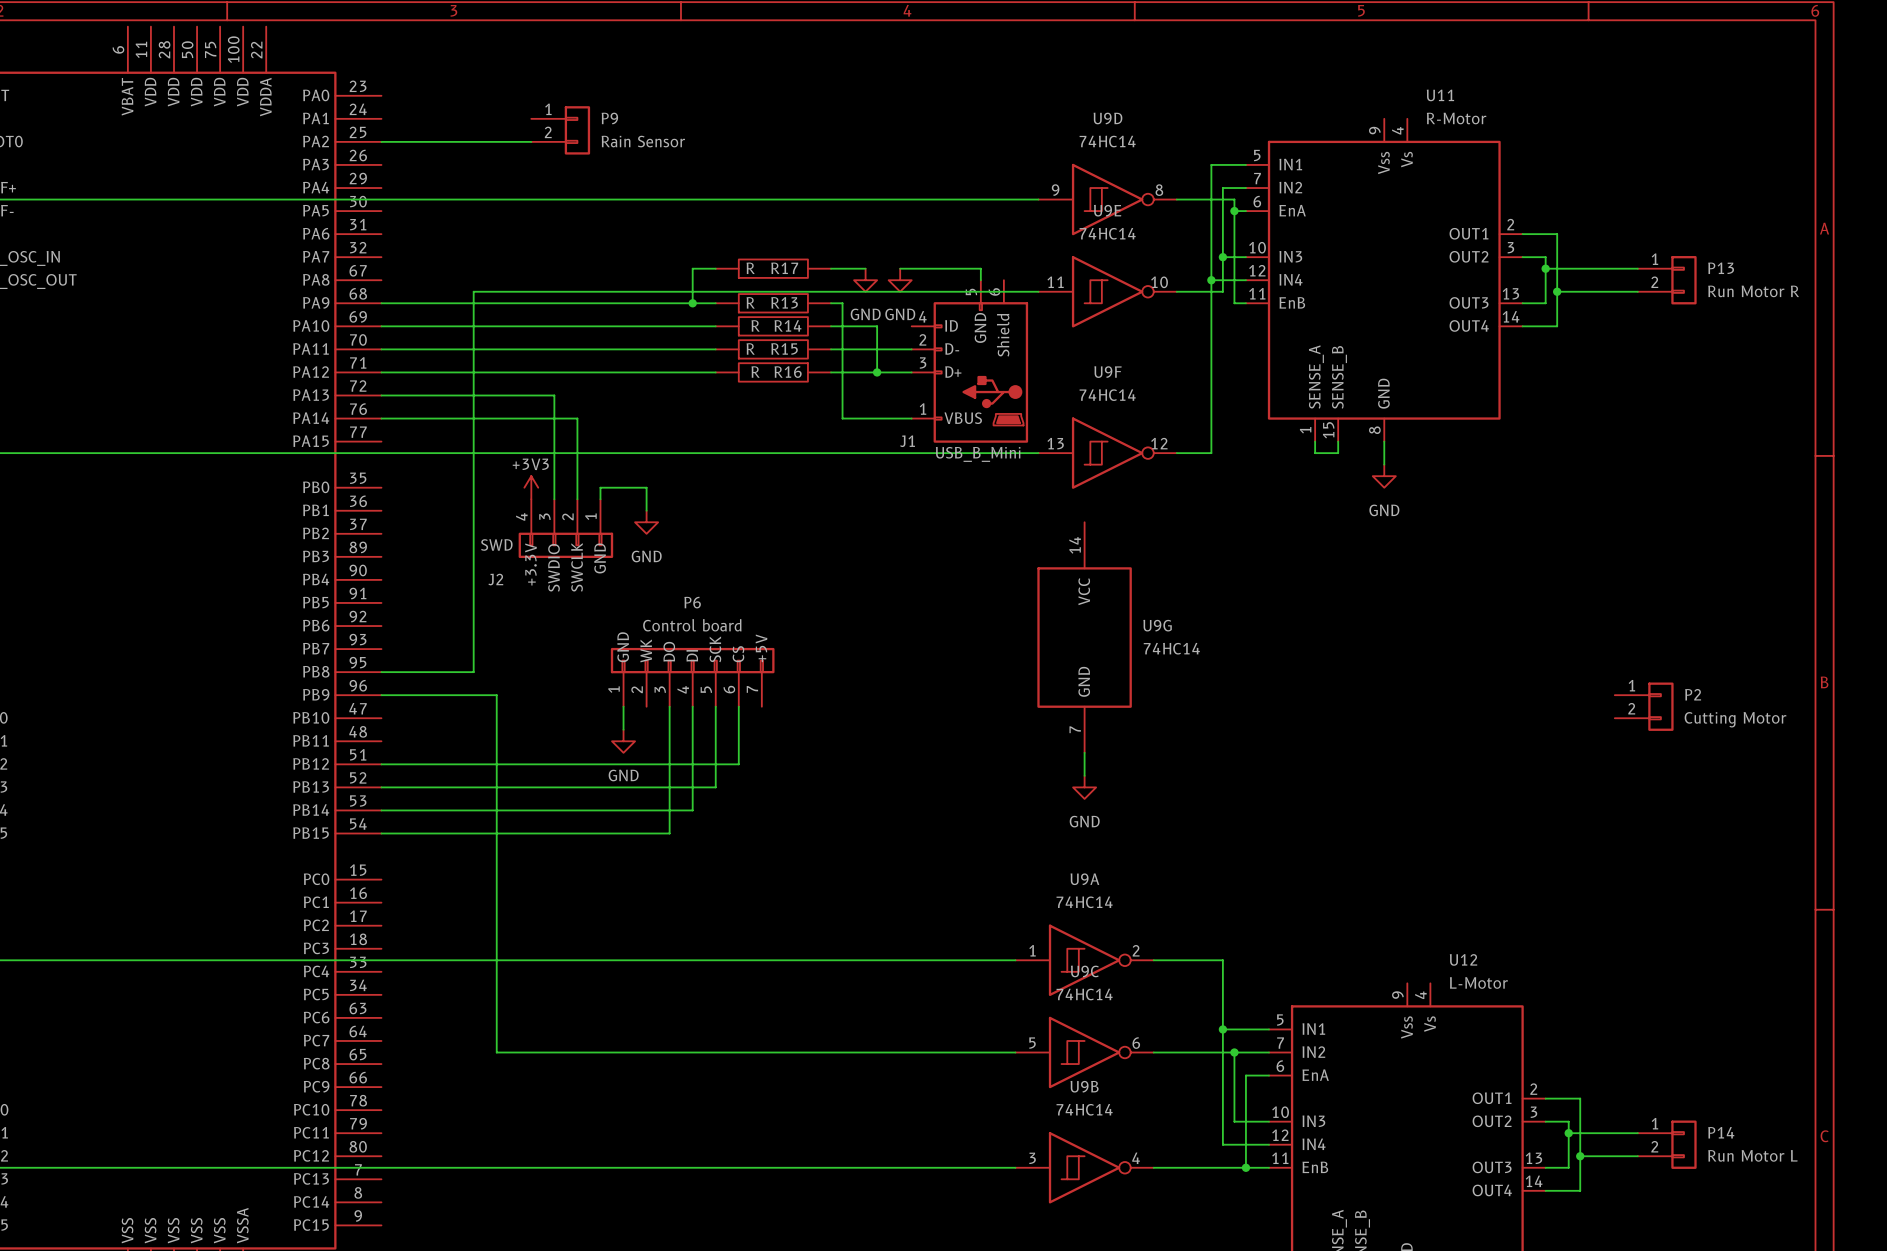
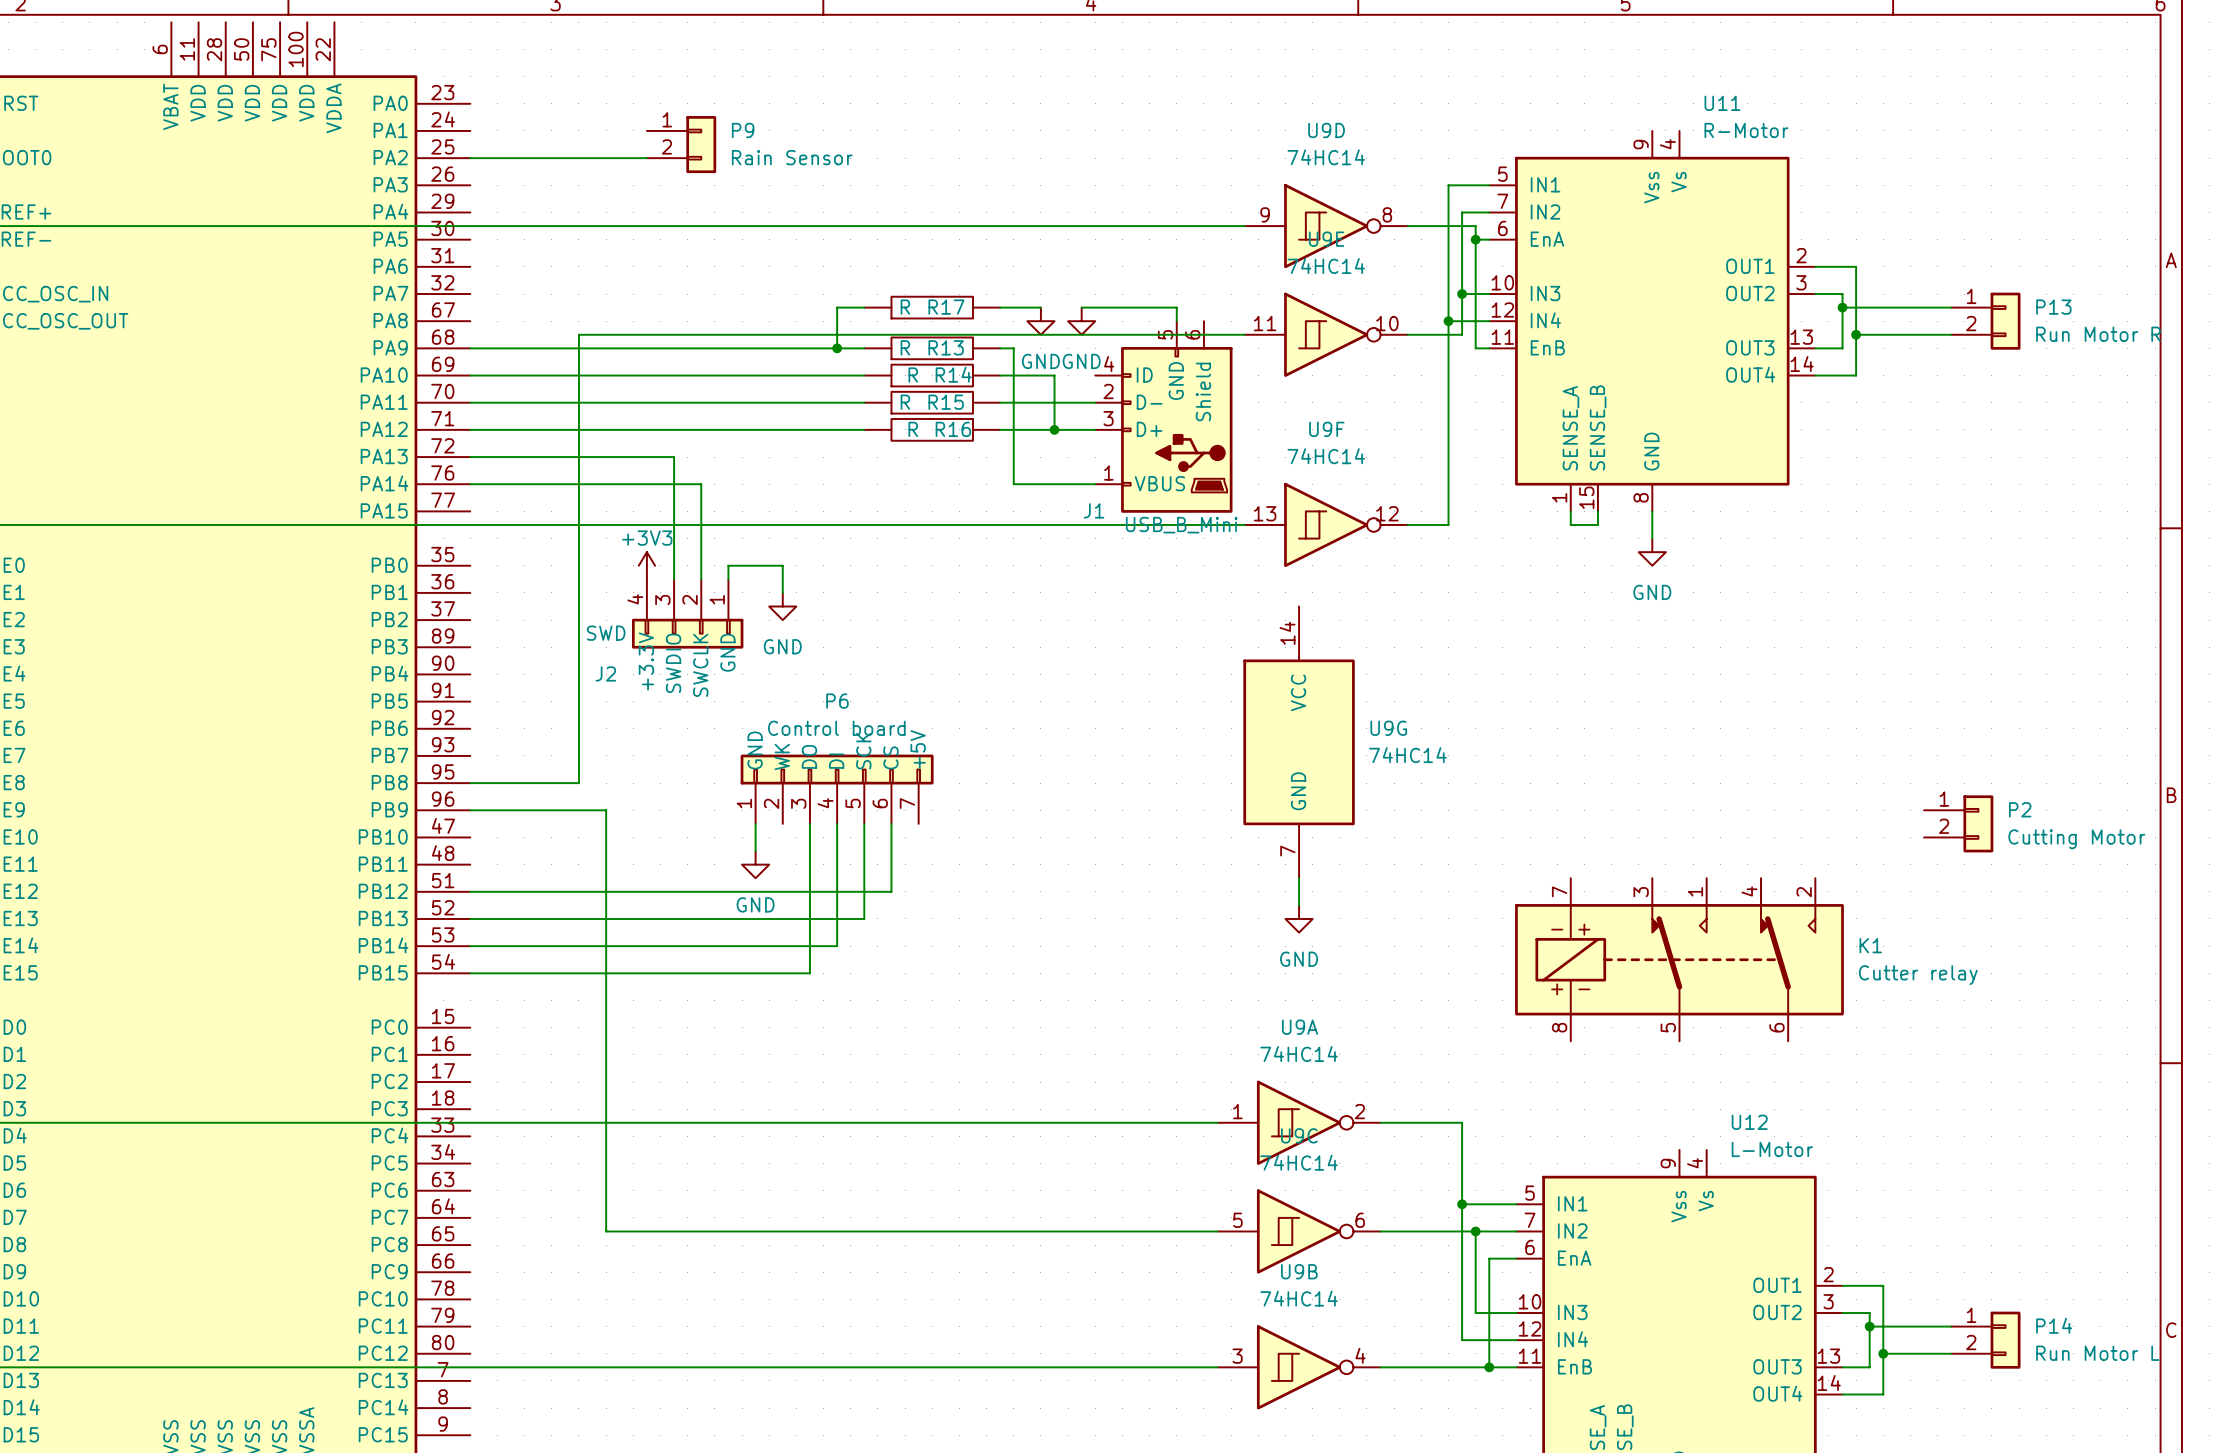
K1: none -> Cutter relay (1679, 959)

